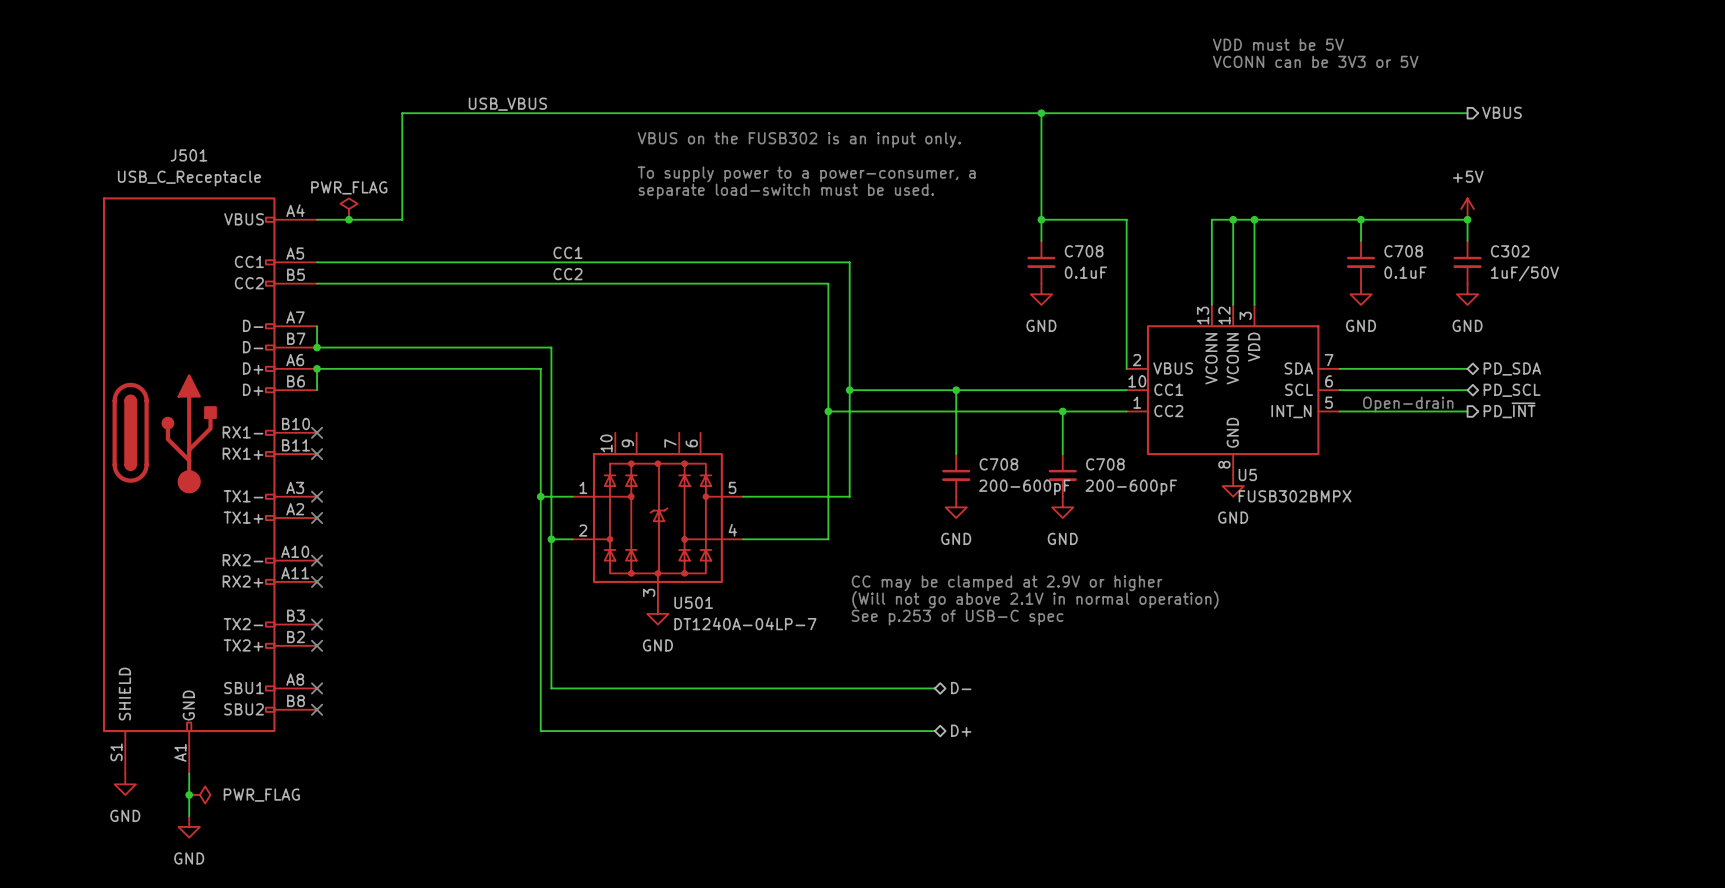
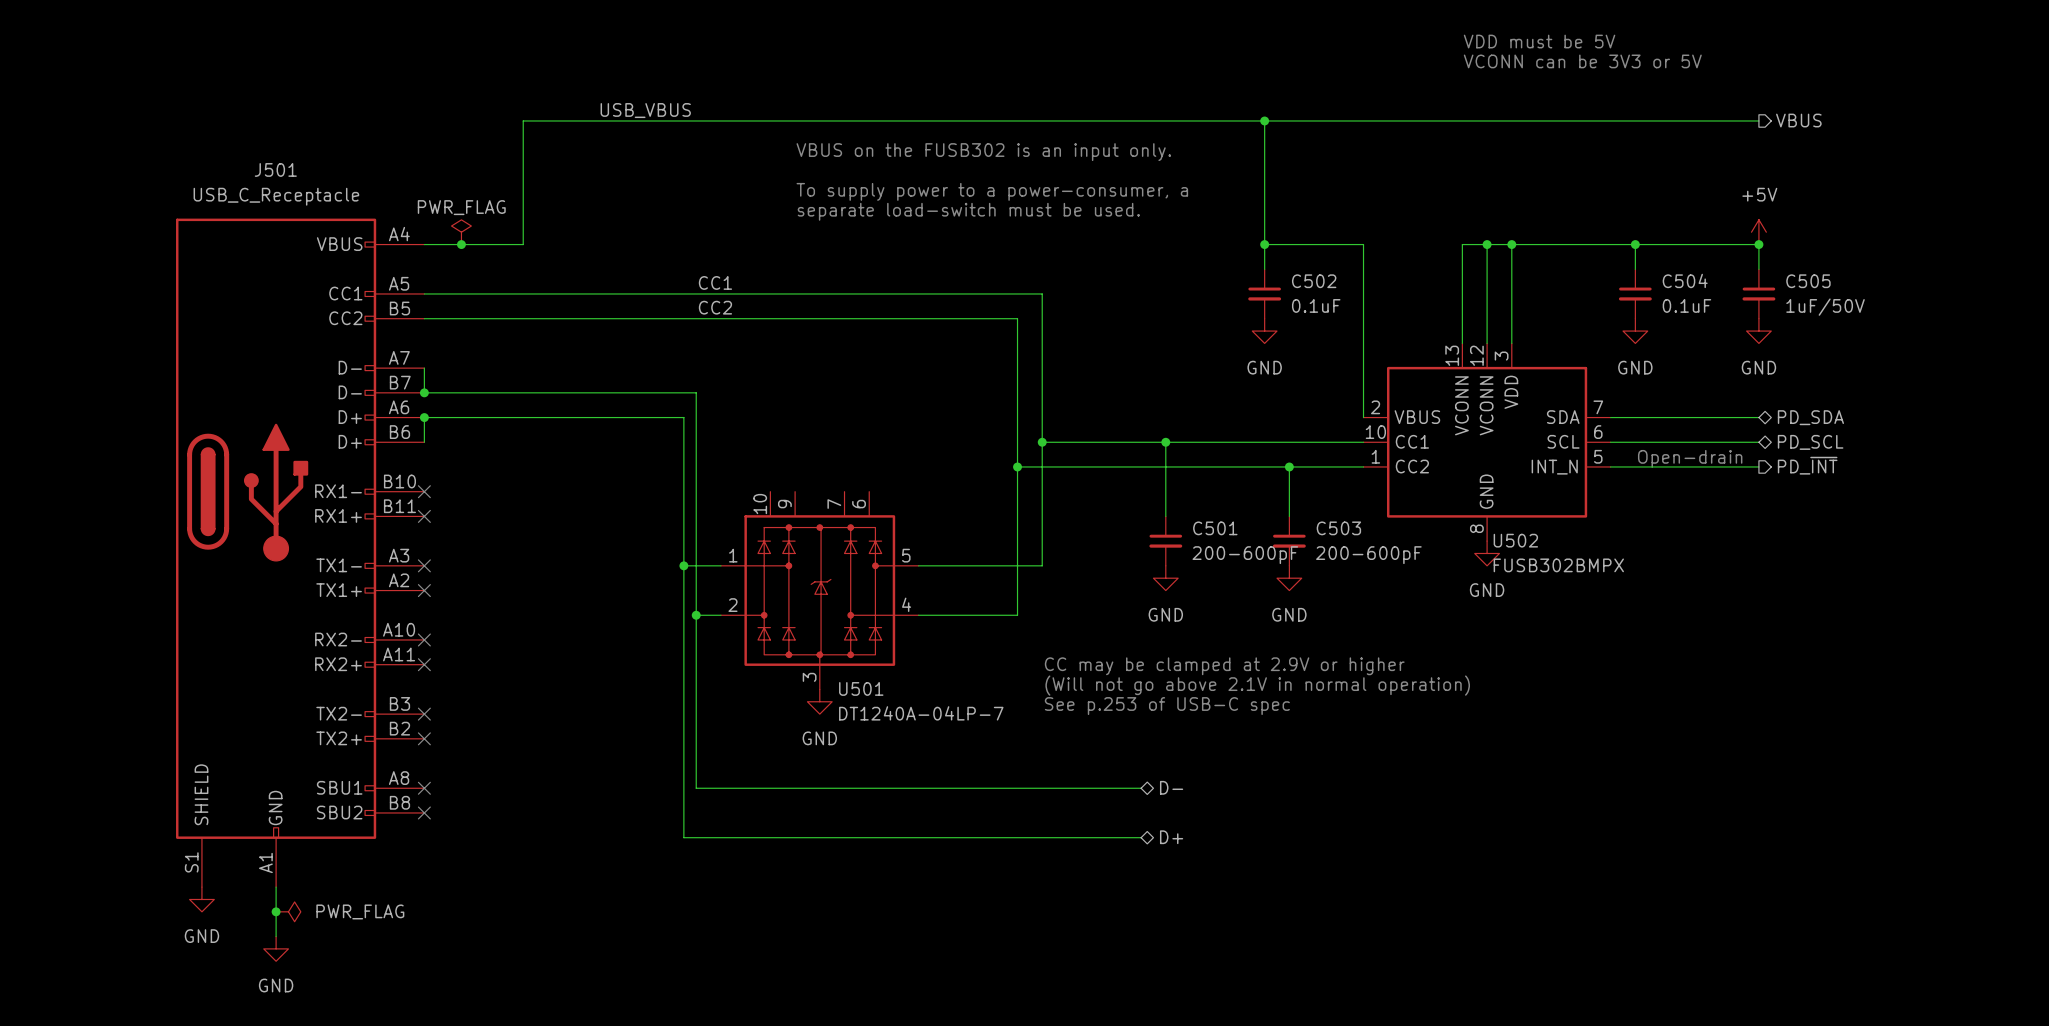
C708 name: C708 (1084, 251) -> C502 (1314, 281)
C708 name: C708 (1403, 251) -> C504 (1685, 280)
C302 name: C302 (1510, 251) -> C505 (1808, 281)
C708 name: C708 (998, 464) -> C501 (1215, 528)
C708 name: C708 (1105, 464) -> C503 (1338, 528)
U5 name: U5 (1247, 475) -> U502 (1515, 540)

